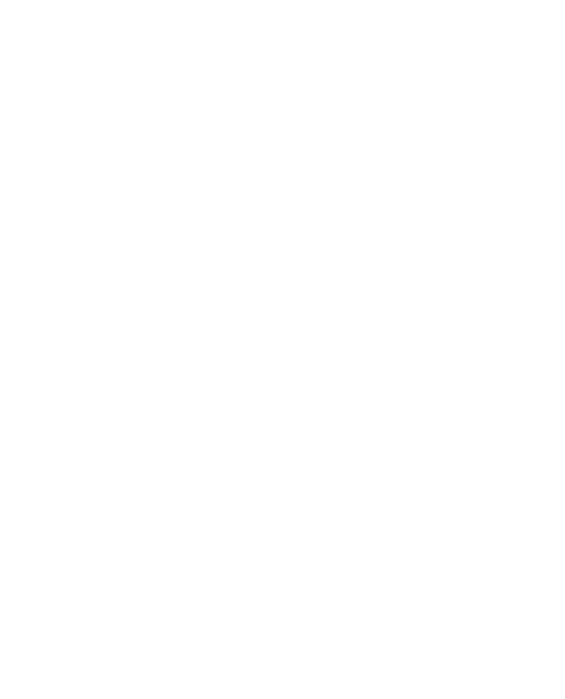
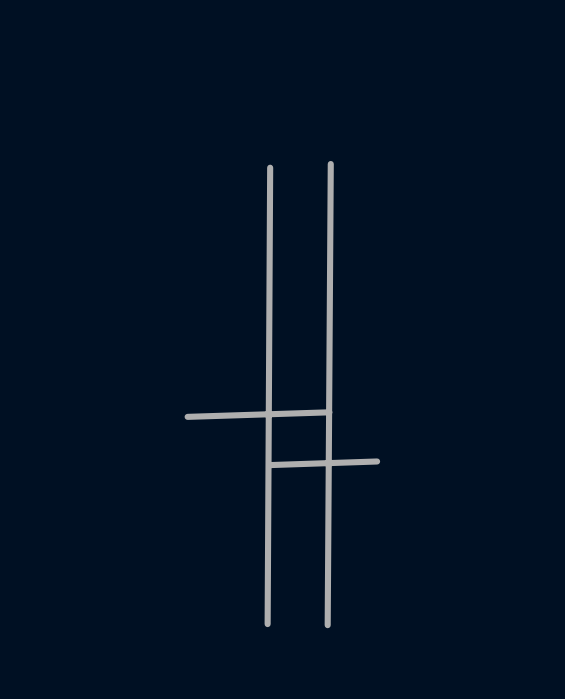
line: none -> (330, 163) (327, 625)
line: none -> (270, 167) (267, 624)
line: none -> (329, 412) (187, 416)
line: none -> (377, 461) (269, 465)

